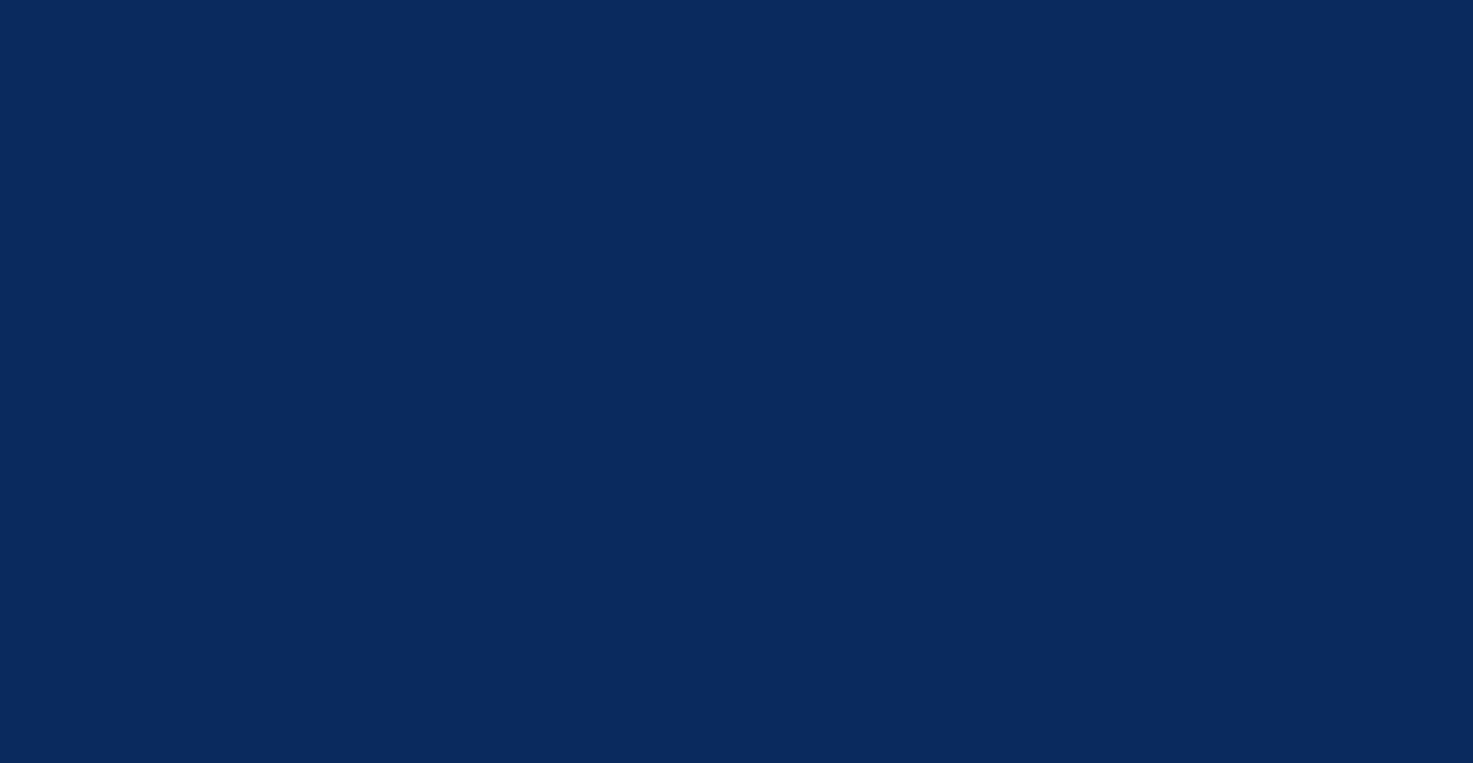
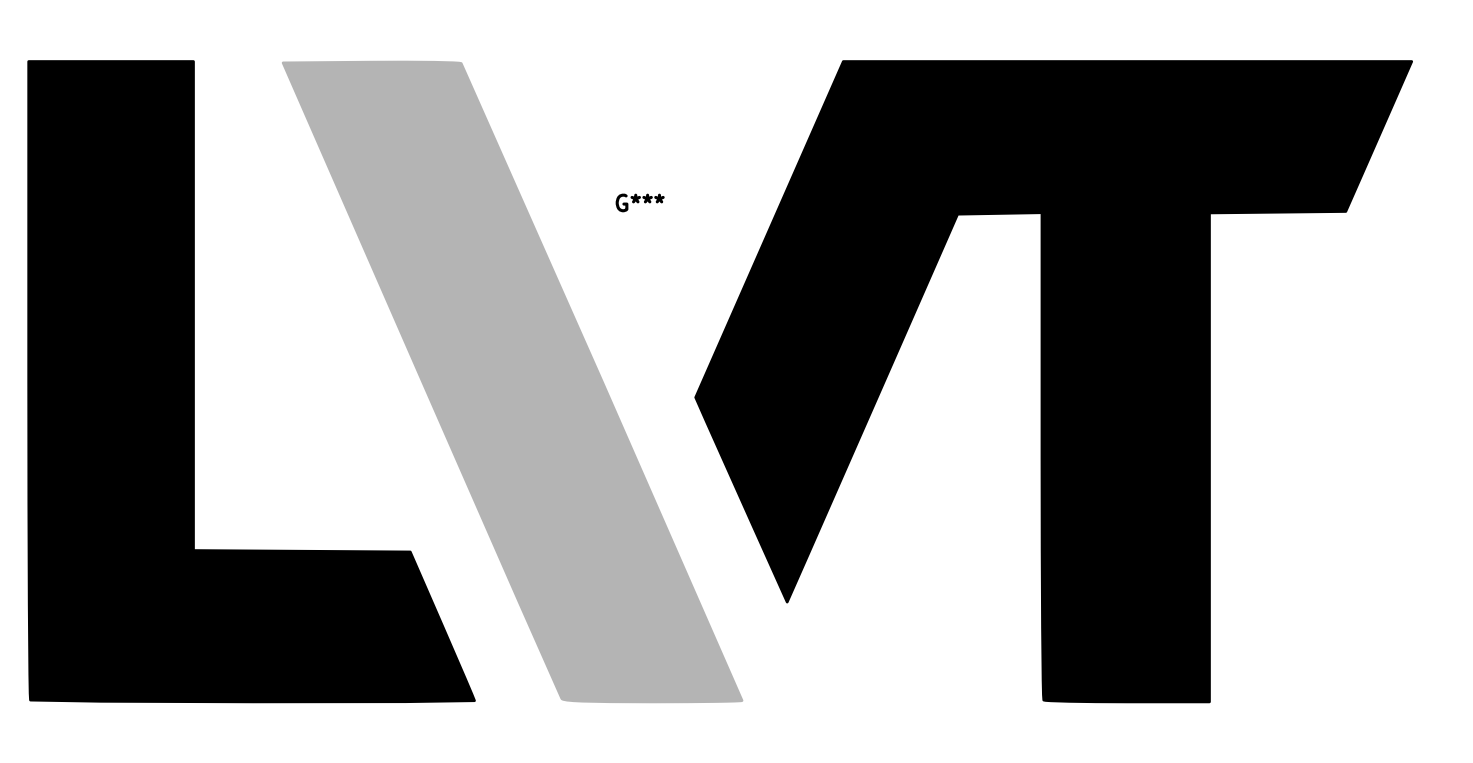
G***: none -> (720, 381)

